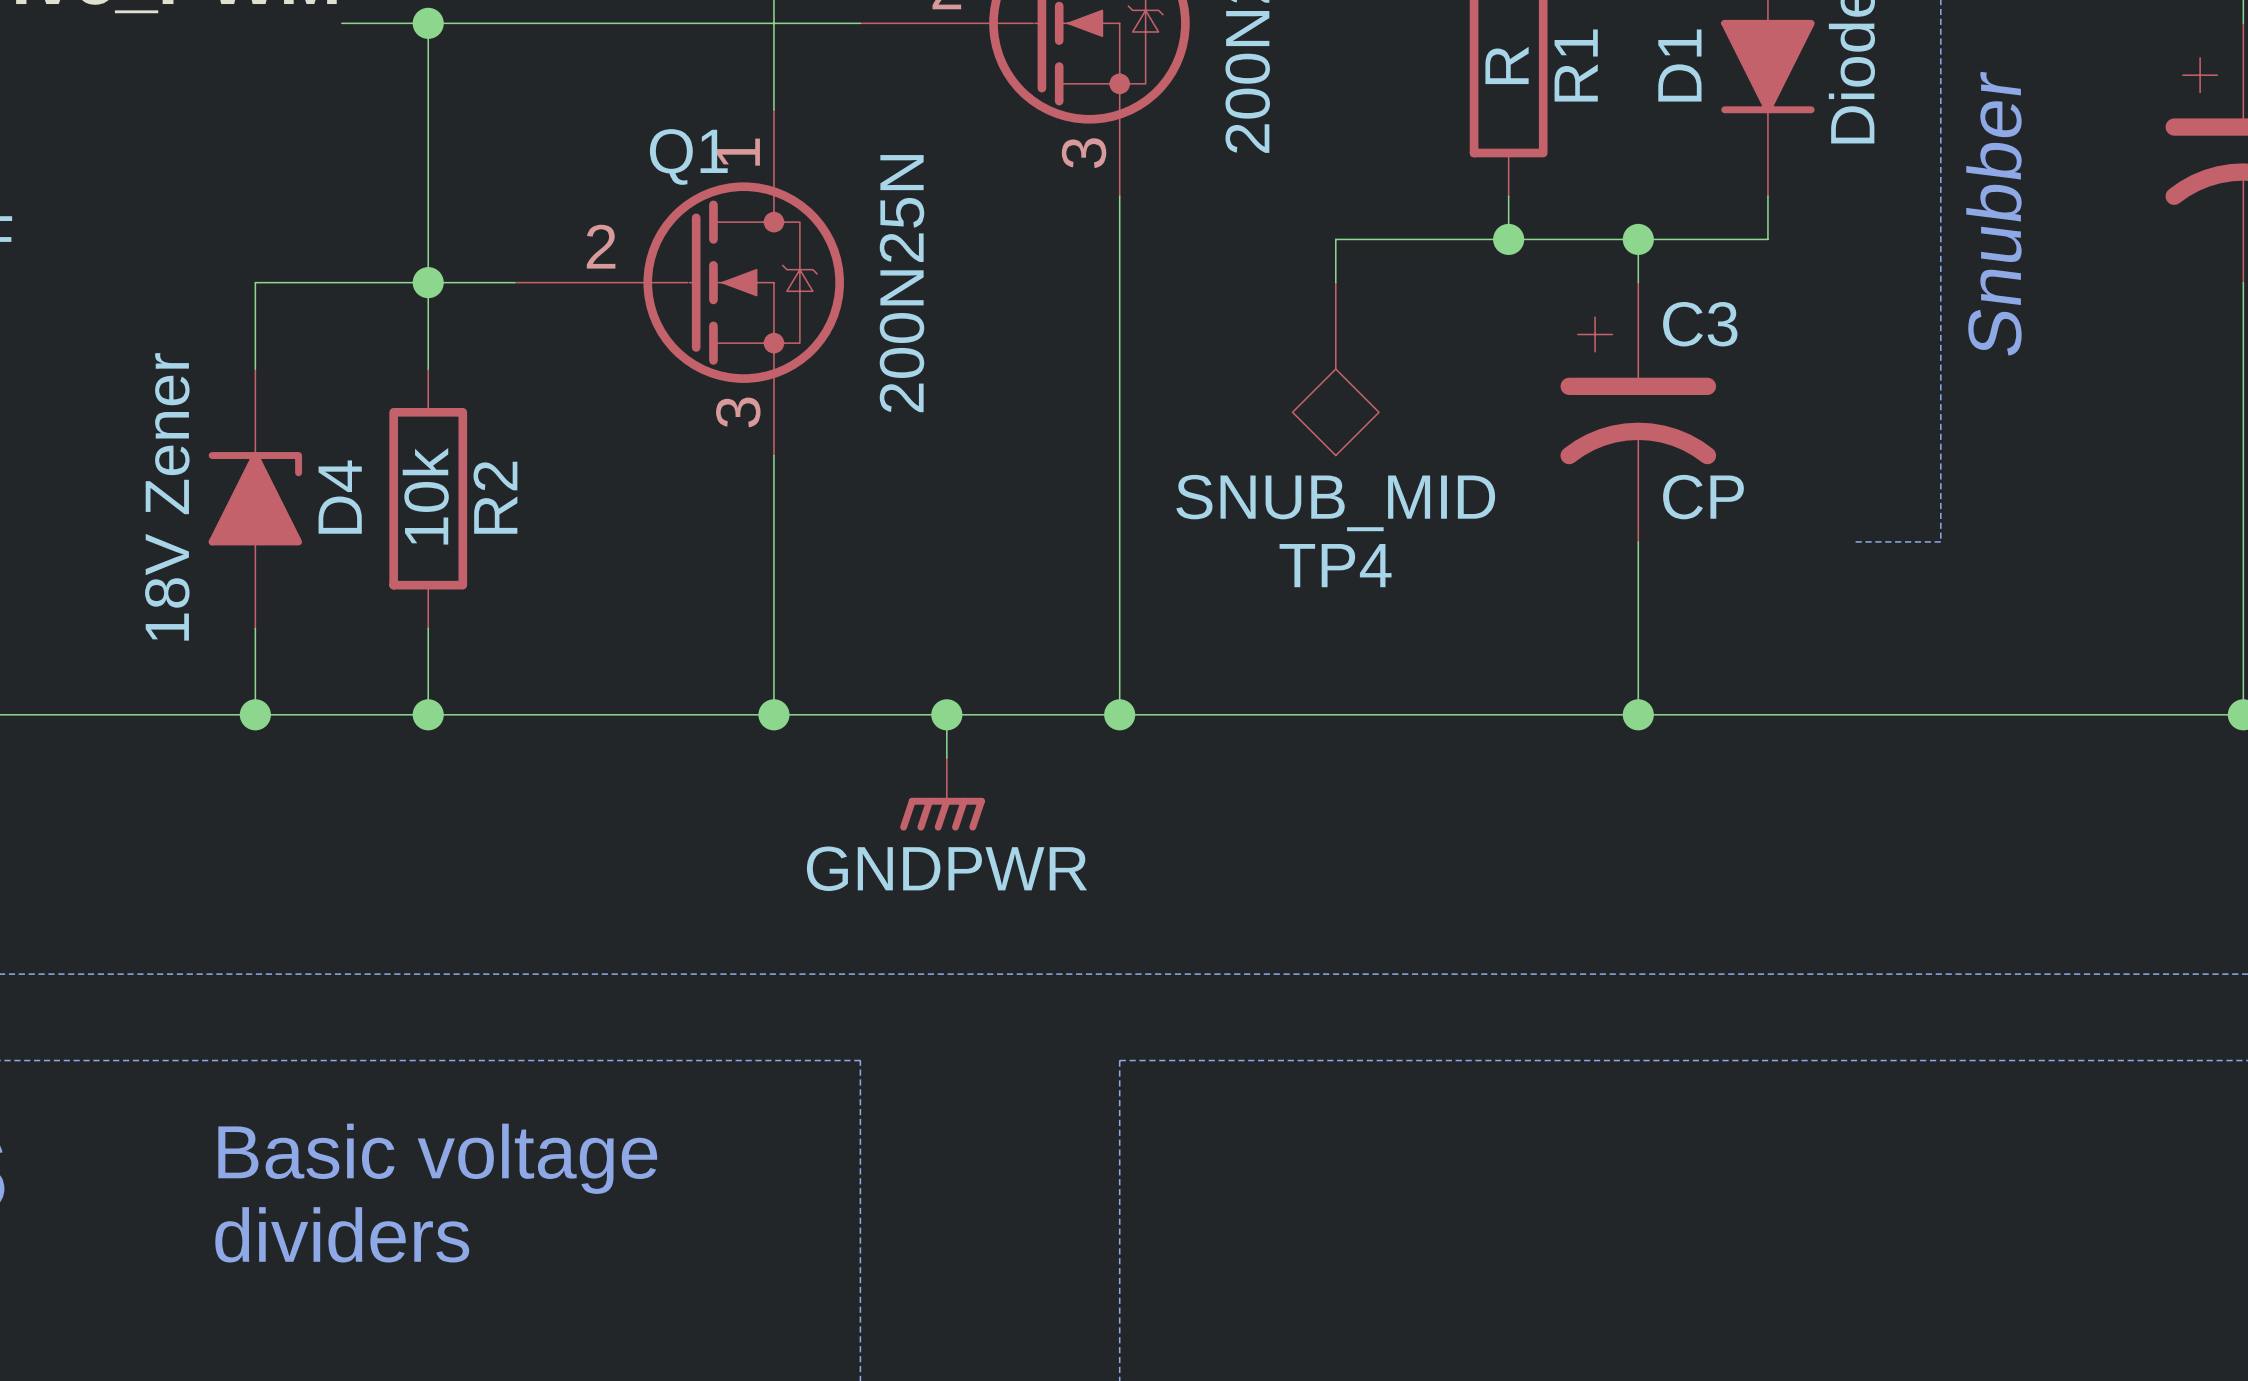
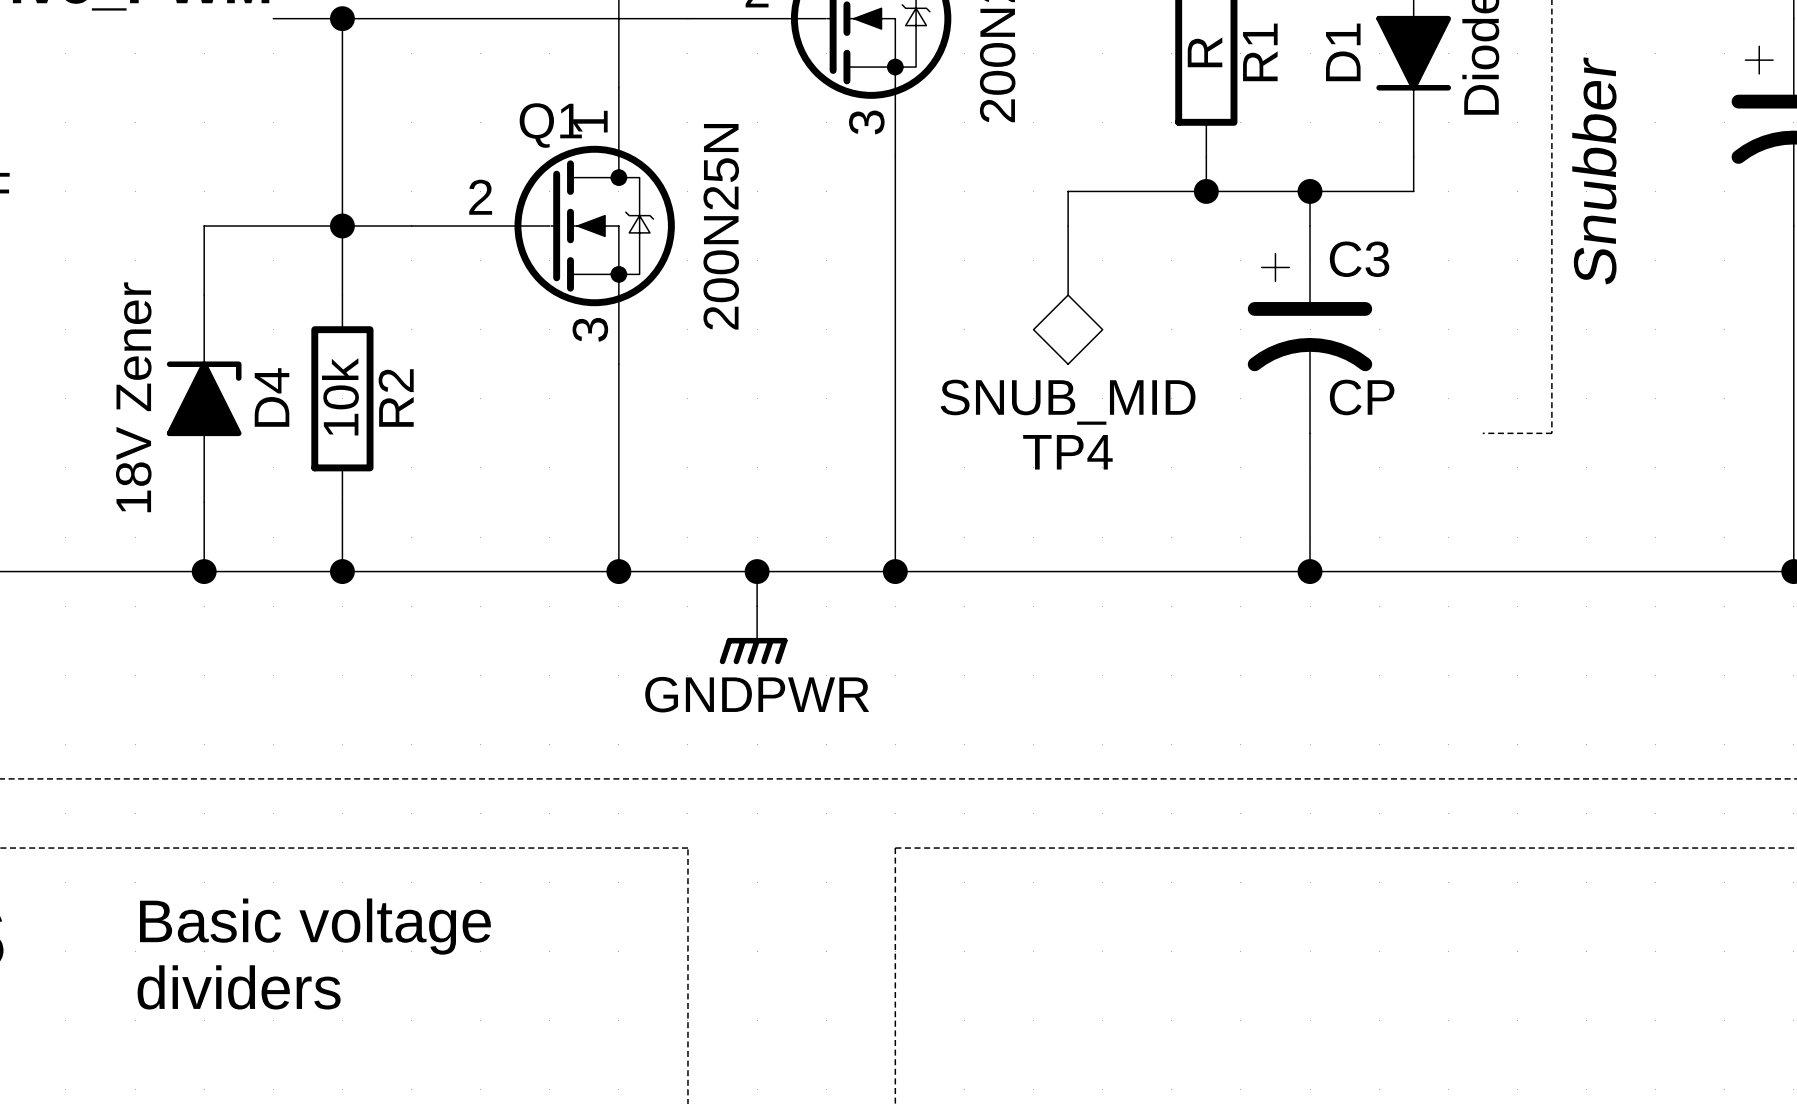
text position: Basic voltage (437, 1158) -> Basic voltage (315, 926)
text position: dividers (342, 1234) -> dividers (239, 987)

